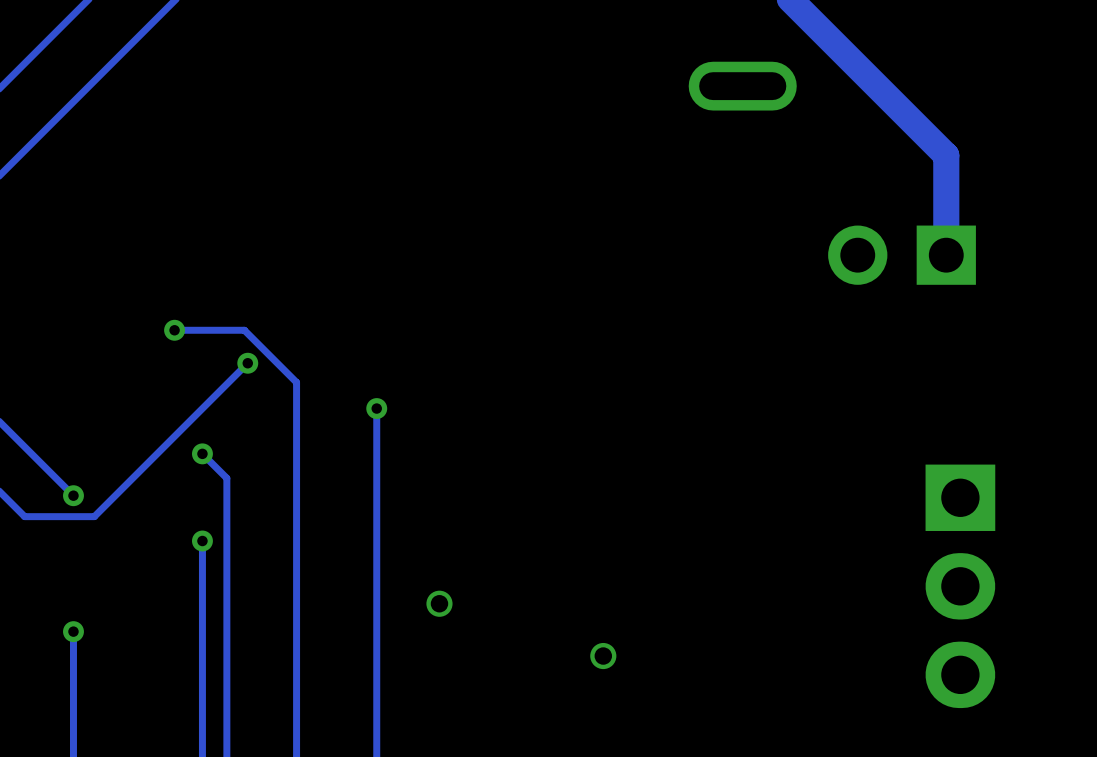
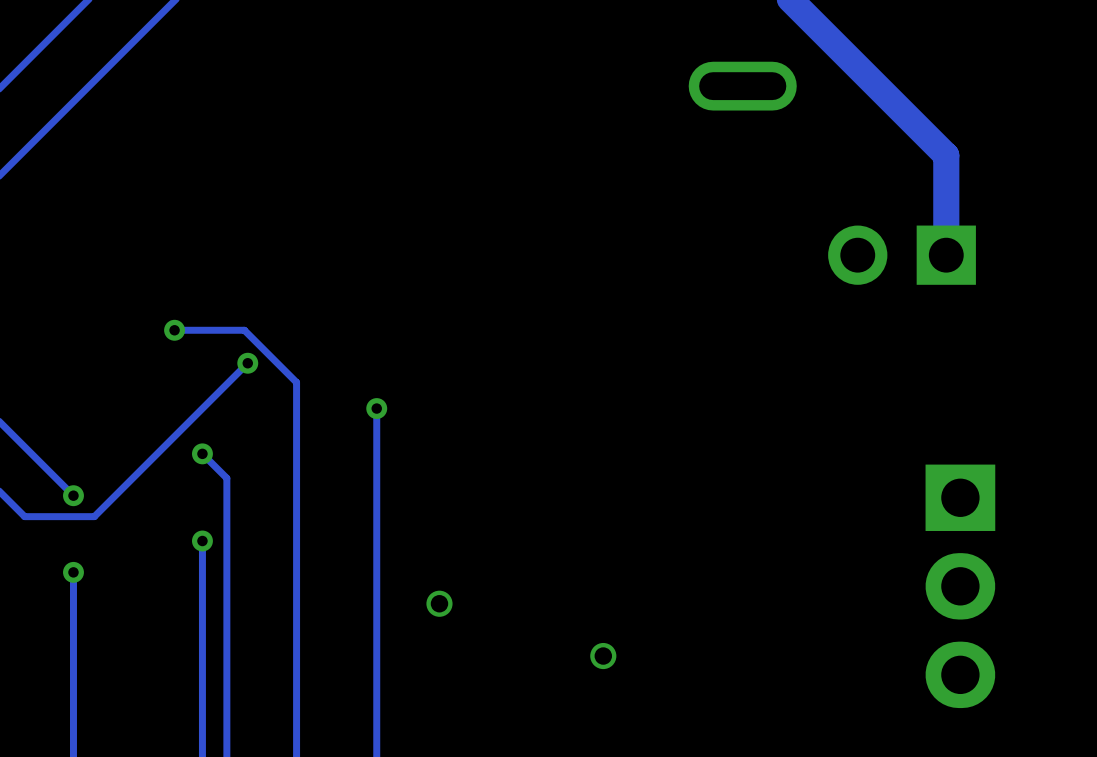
track: none -> (73, 572) (73, 631)
via position: (73, 631) -> (73, 572)

